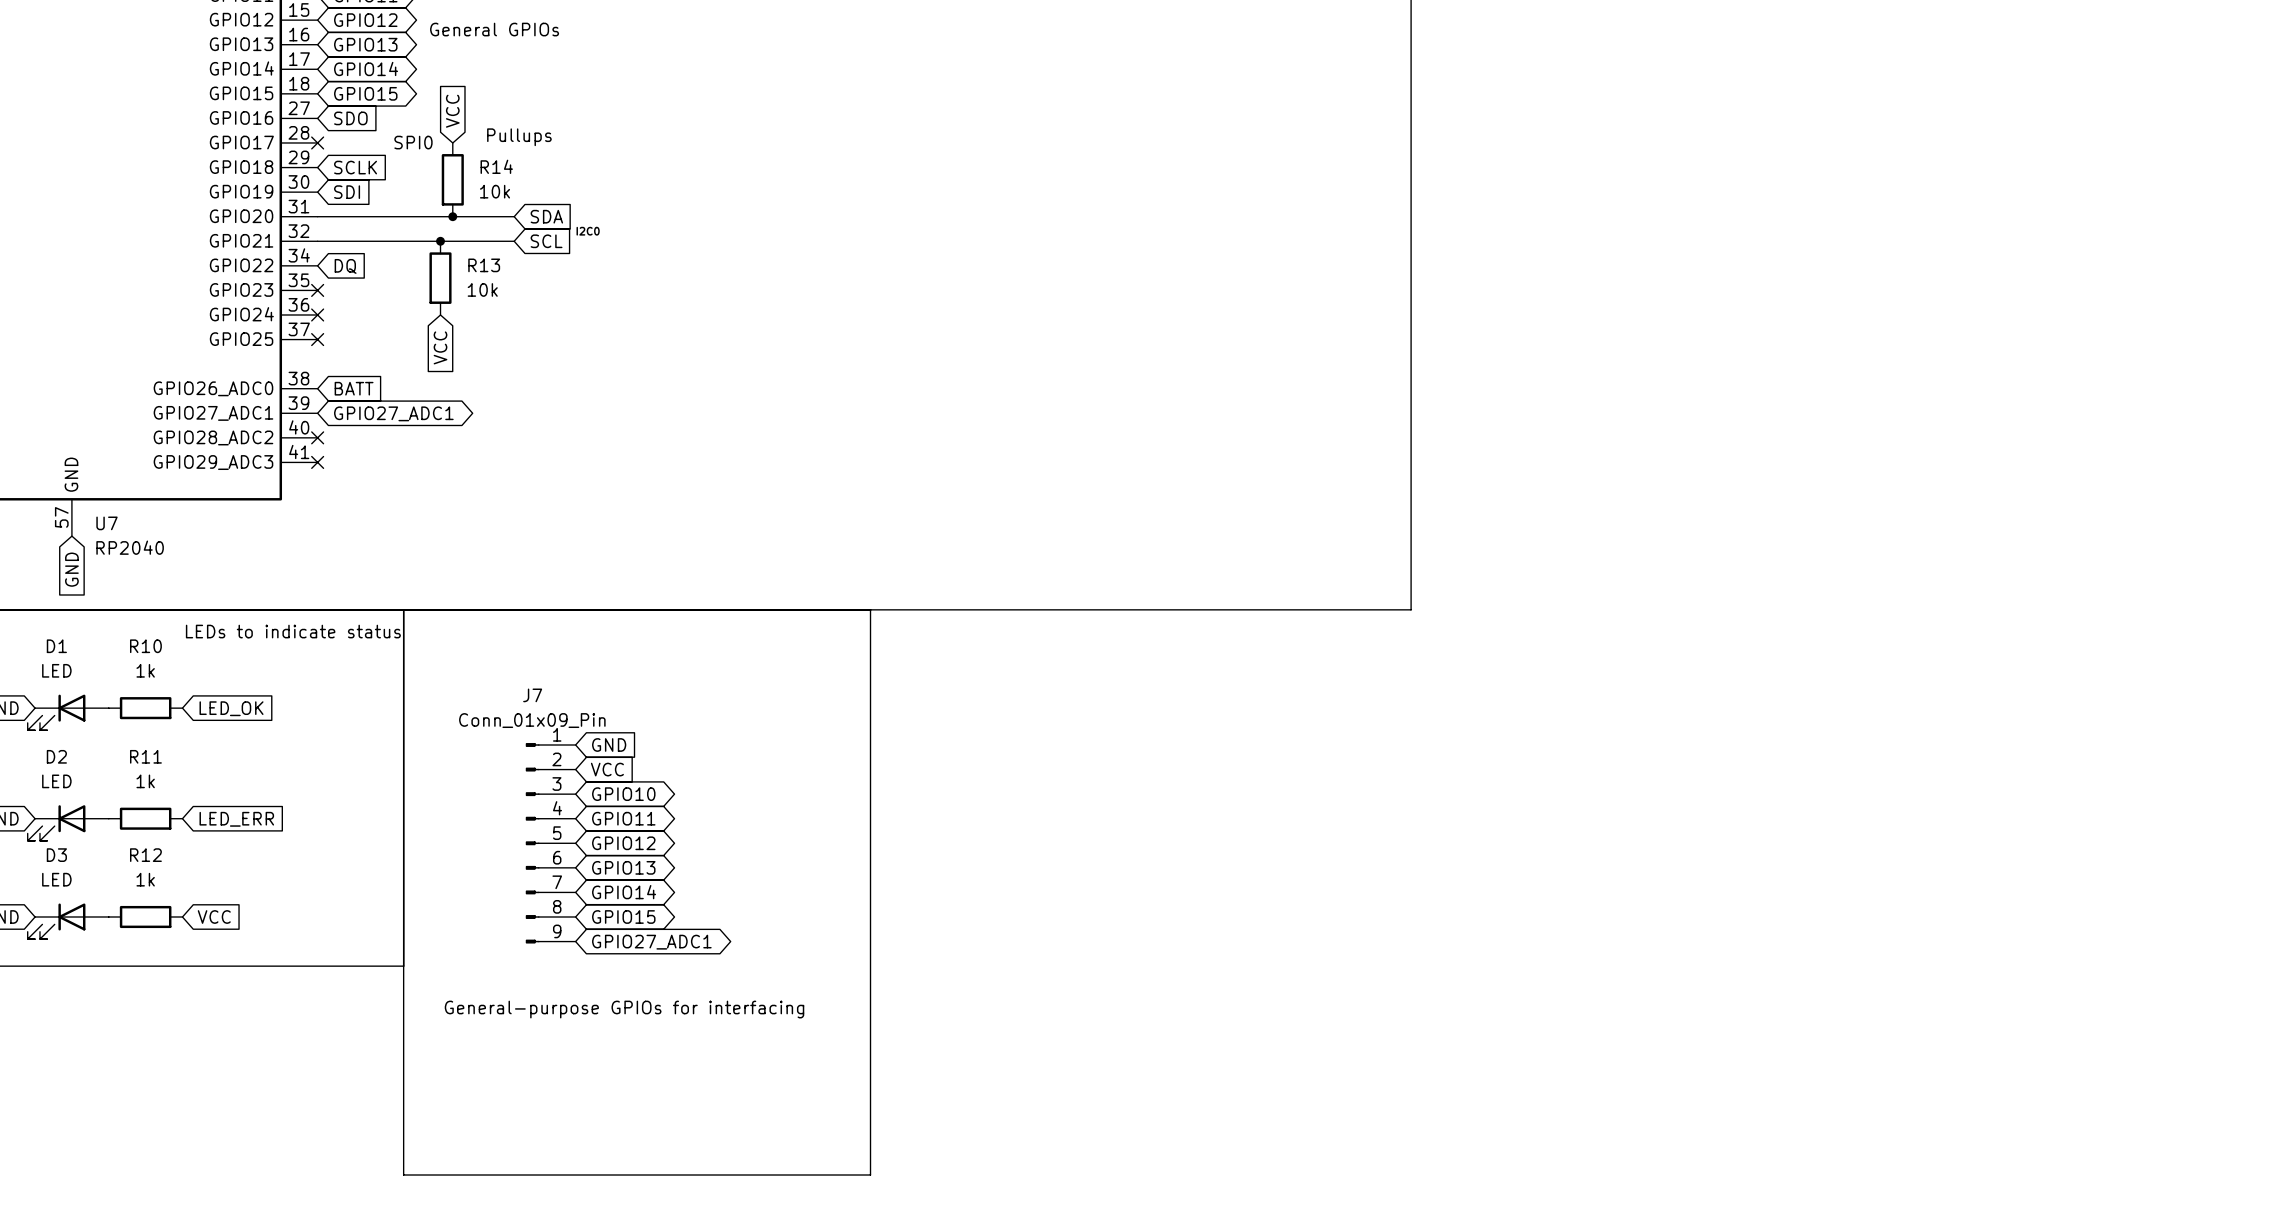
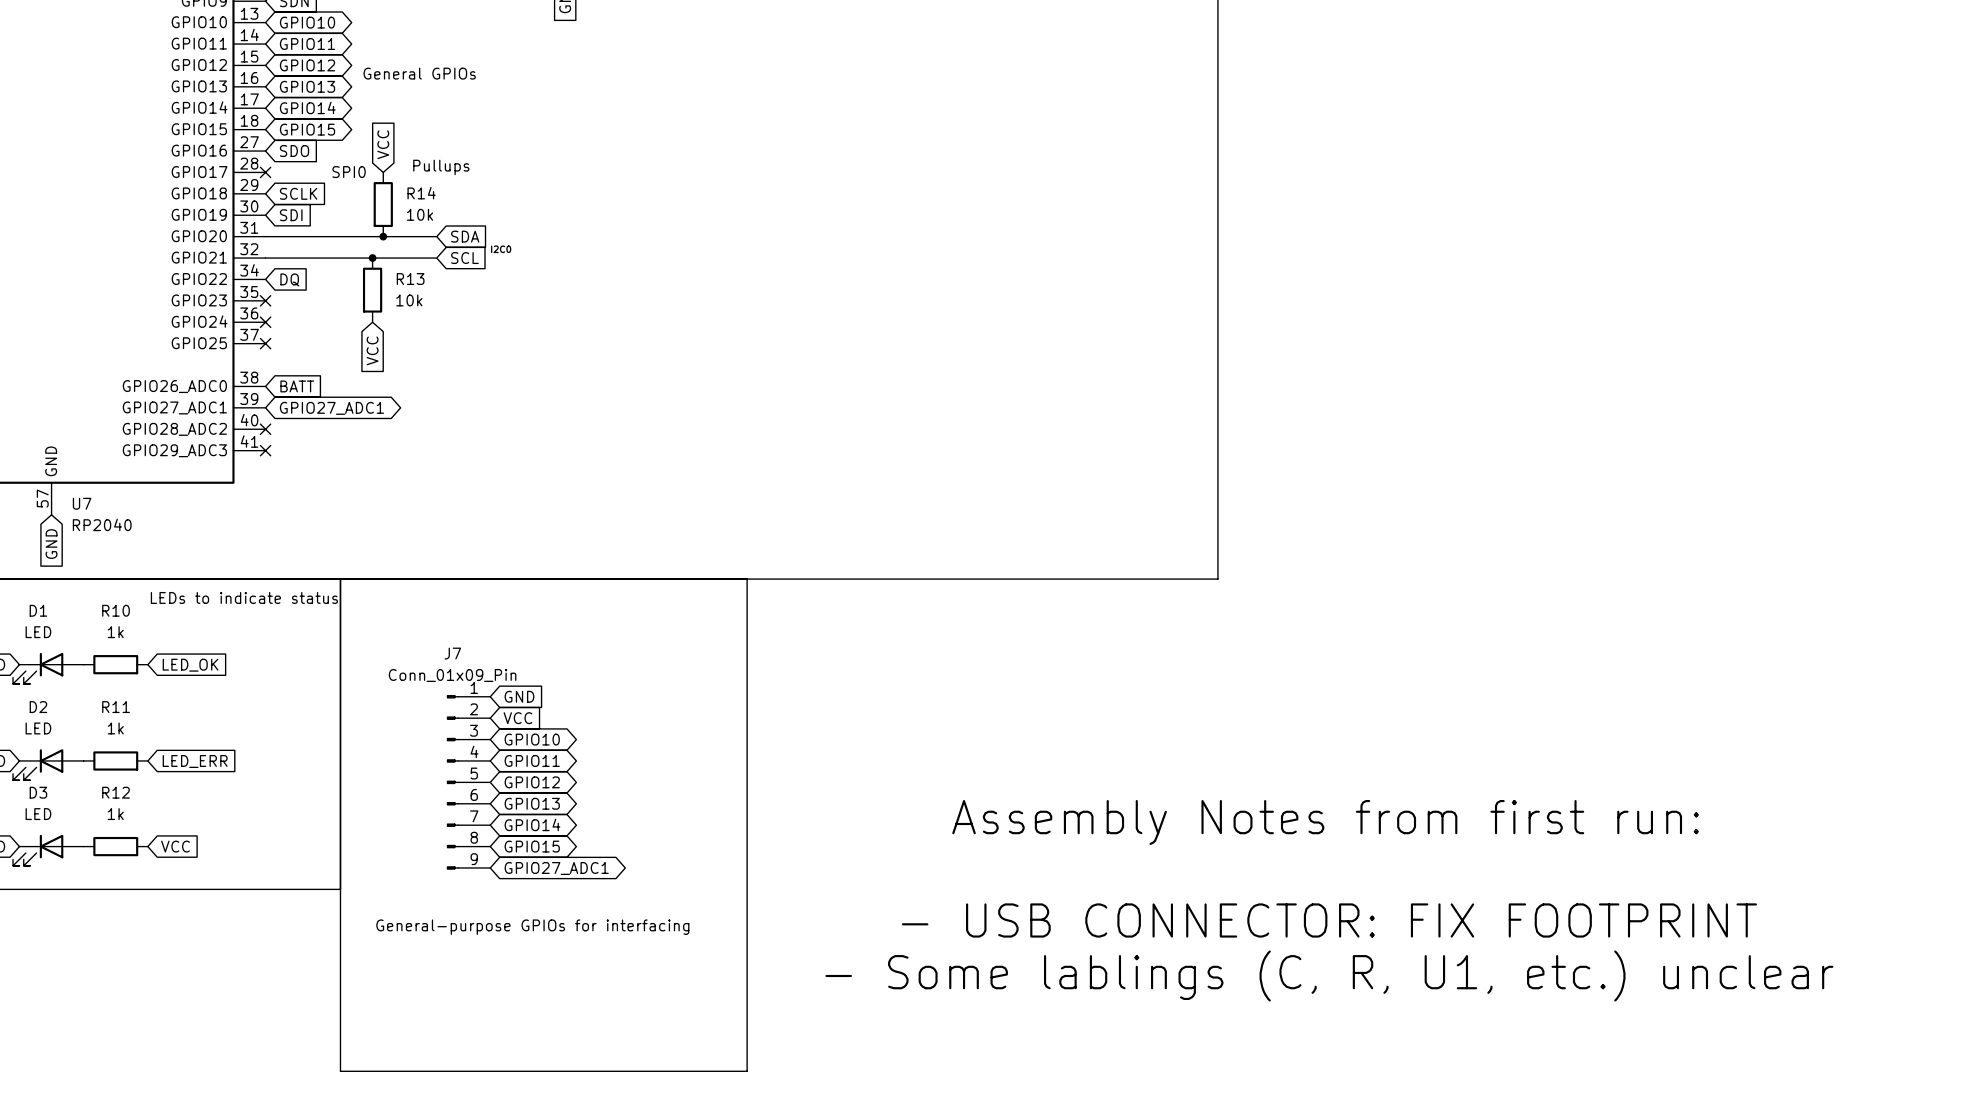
text: none -> Assembly Notes from first run: (1325, 822)
text: none -> - USB CONNECTOR: FIX FOOTPRINT (1329, 920)
text: none -> - Some lablings (C, R, U1, etc.) unclear (1329, 975)

